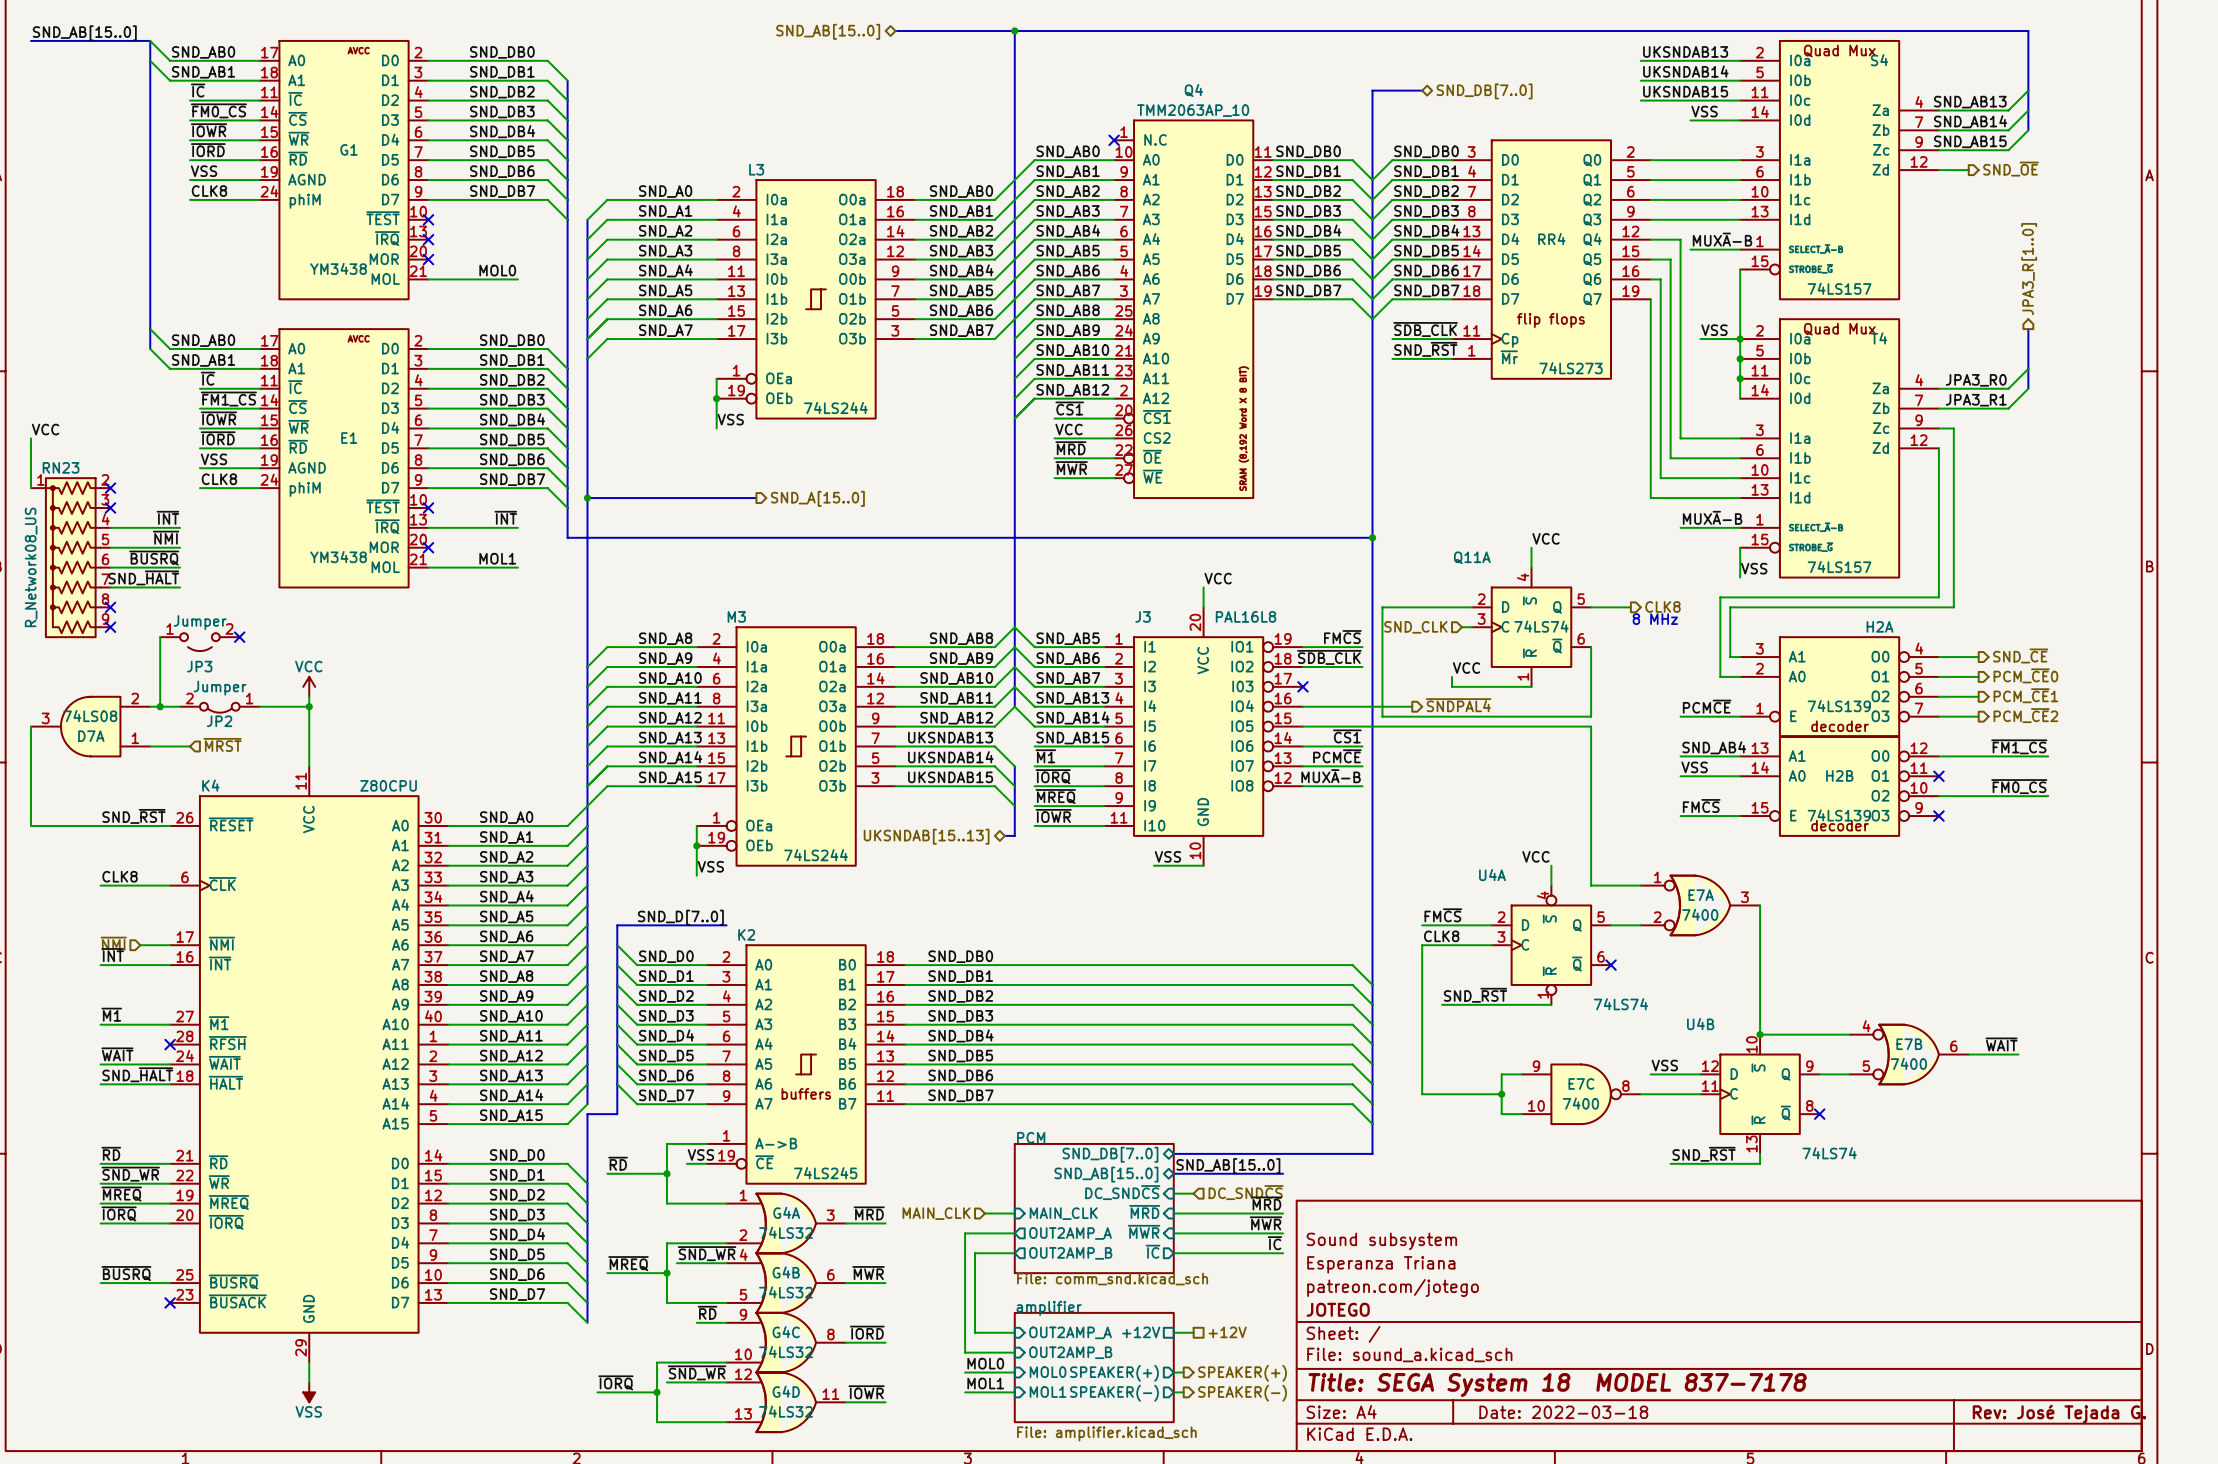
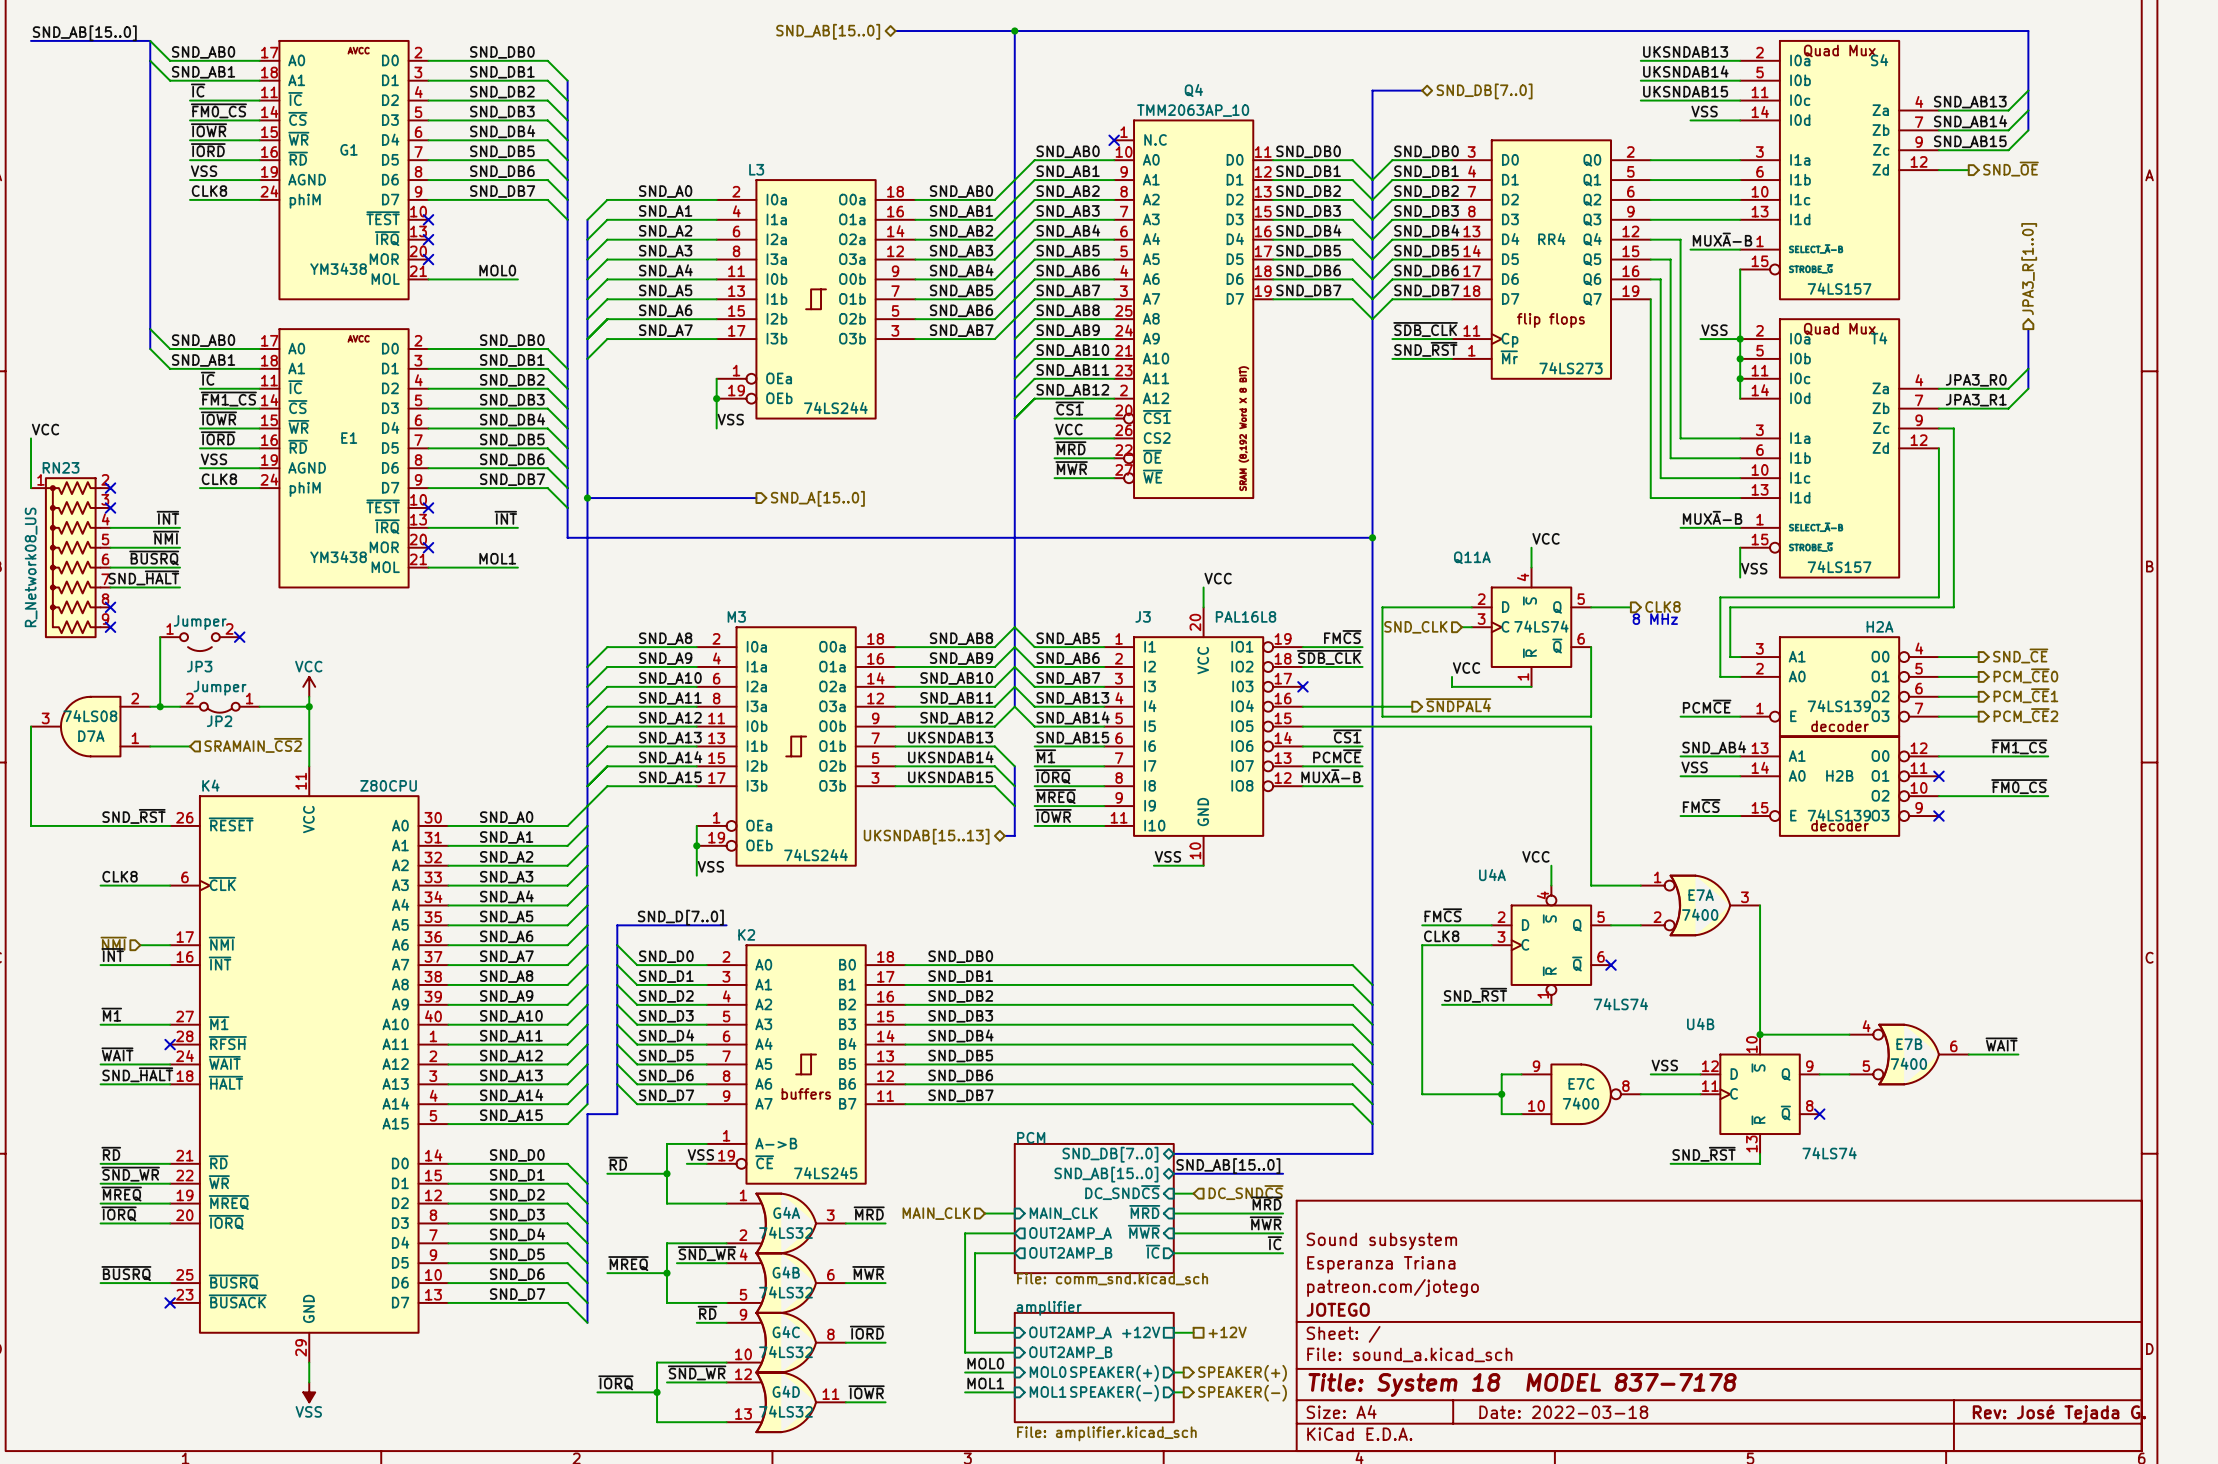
hierarchical label: ~{MRST} (222, 744) -> SRAMAIN_~{CS2} (253, 745)
title block: Title: SEGA System 18 MODEL 837-7178 (1557, 1385) -> Title: System 18 MODEL 837-7178 (1522, 1385)

